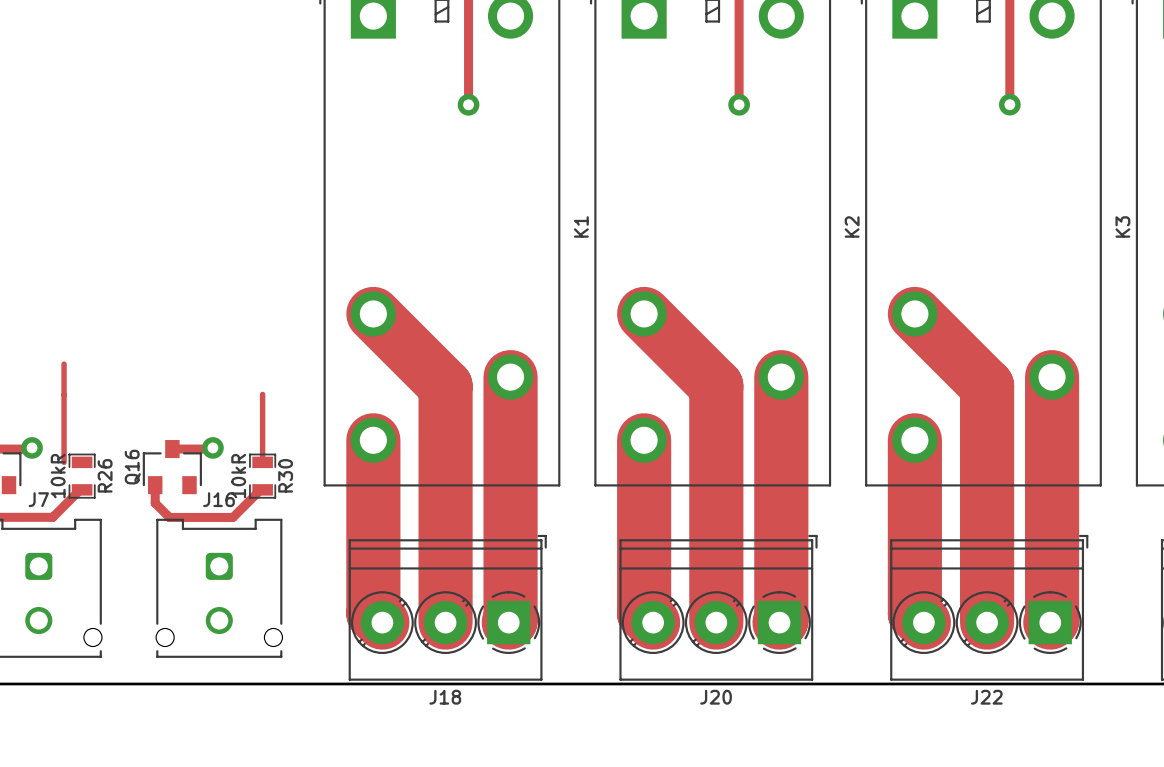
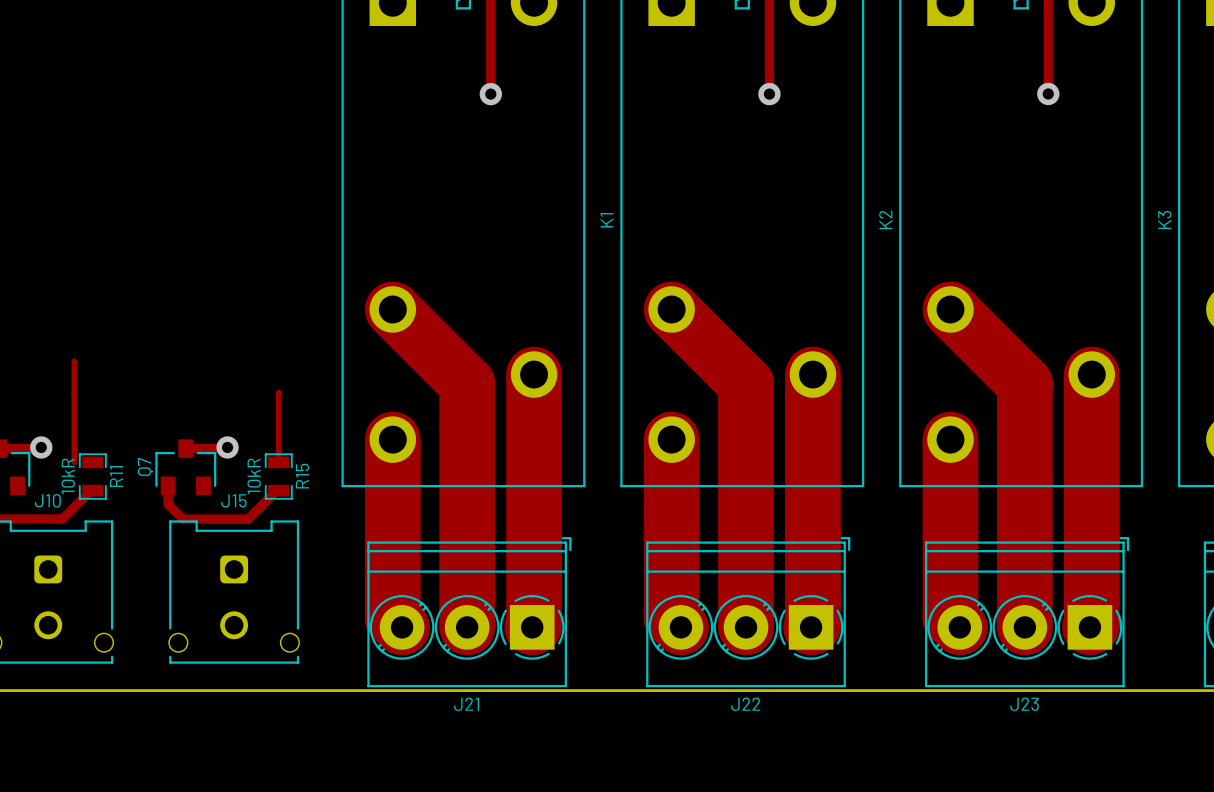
Q16 name: Q16 (132, 467) -> Q7 (145, 466)
R26 name: R26 (105, 475) -> R11 (116, 476)
R30 name: R30 (285, 475) -> R15 (302, 476)
J7 name: J7 (38, 499) -> J10 (47, 500)
J16 name: J16 (219, 499) -> J15 (233, 500)
J18 name: J18 (445, 697) -> J21 (466, 704)
J20 name: J20 (716, 697) -> J22 (745, 704)
J22 name: J22 (986, 697) -> J23 (1024, 704)

